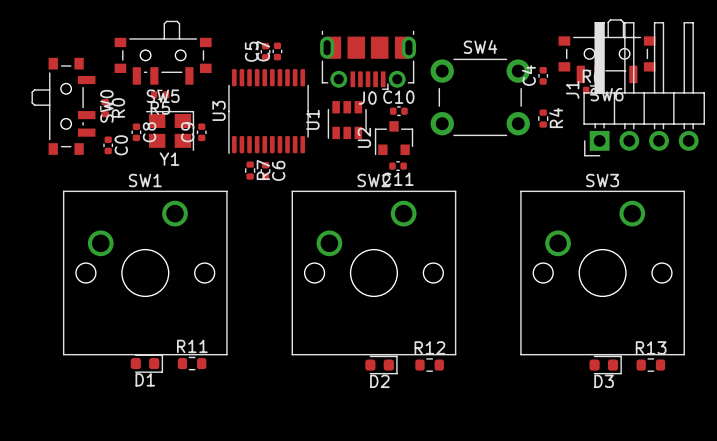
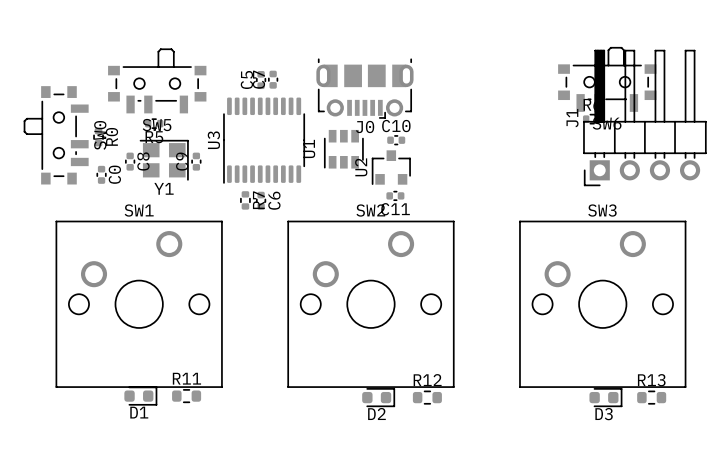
C4: (543, 75) -> none
SW4: (480, 97) -> none
R4: (543, 118) -> none

